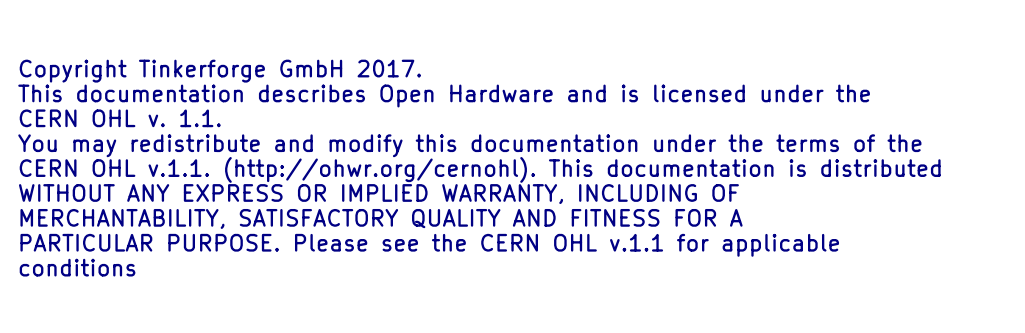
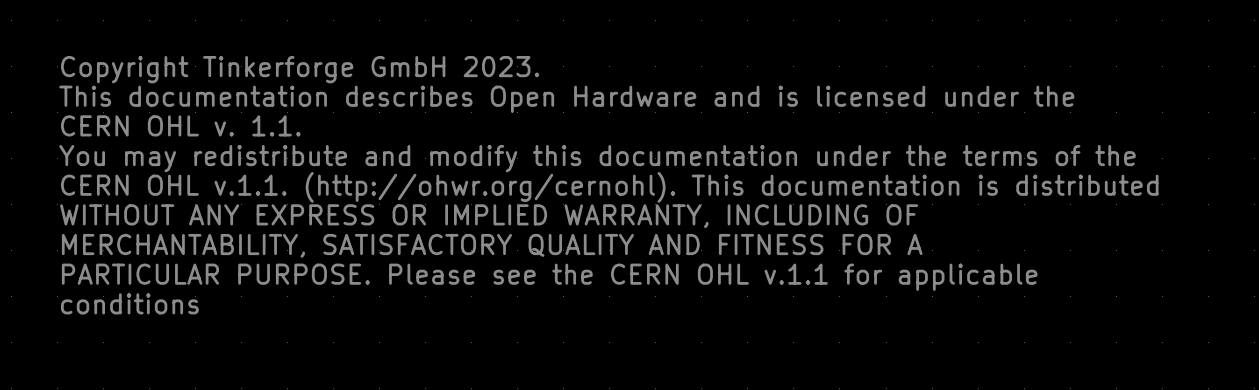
text: Copyright Tinkerforge GmbH 2017. (220, 71) -> Copyright Tinkerforge GmbH 2023. (300, 69)

